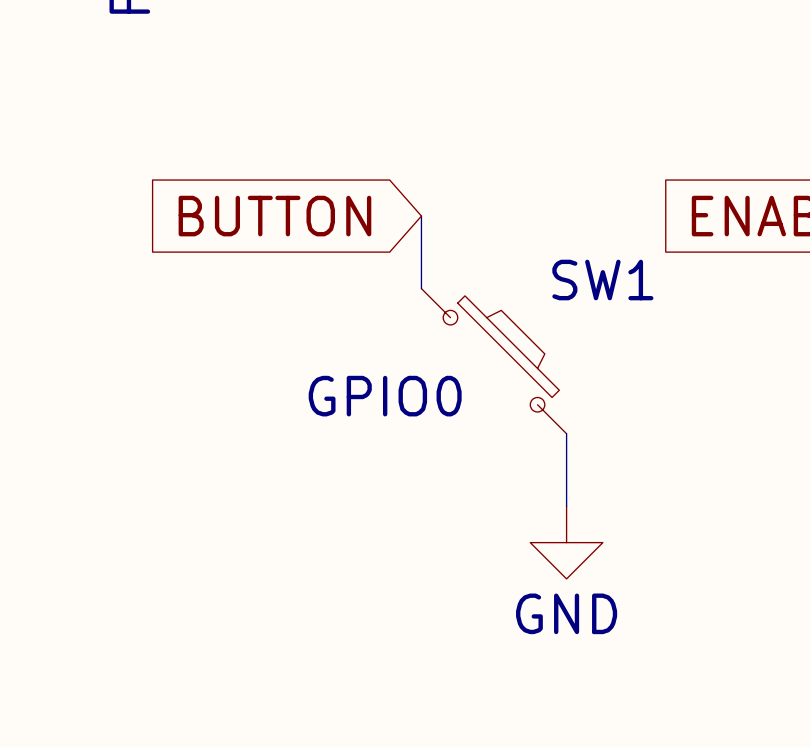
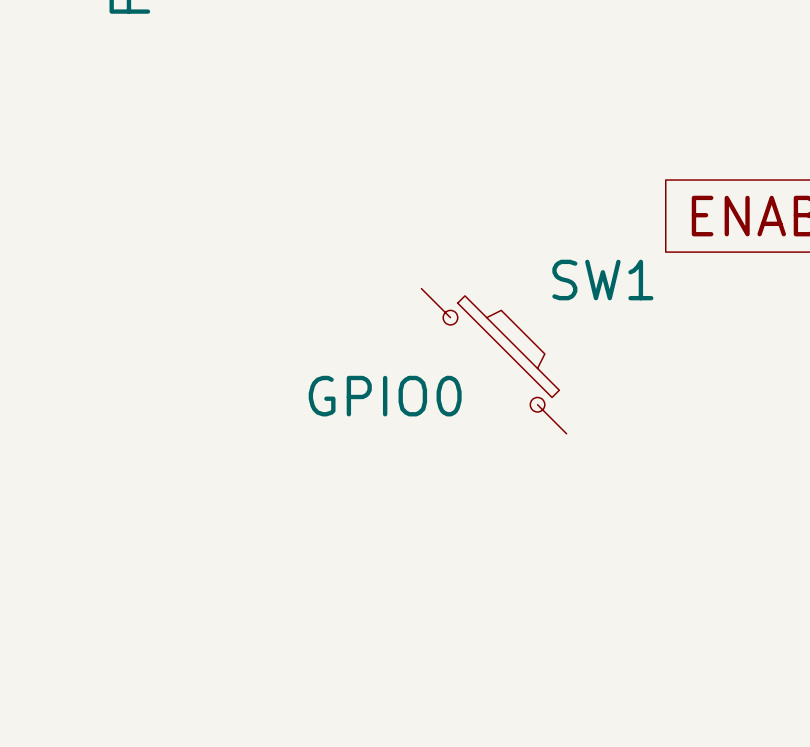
global label: BUTTON (274, 216) -> none
wire: (421, 216) (421, 288) -> none
wire: (566, 433) (566, 506) -> none
power symbol: GND (566, 542) -> none

